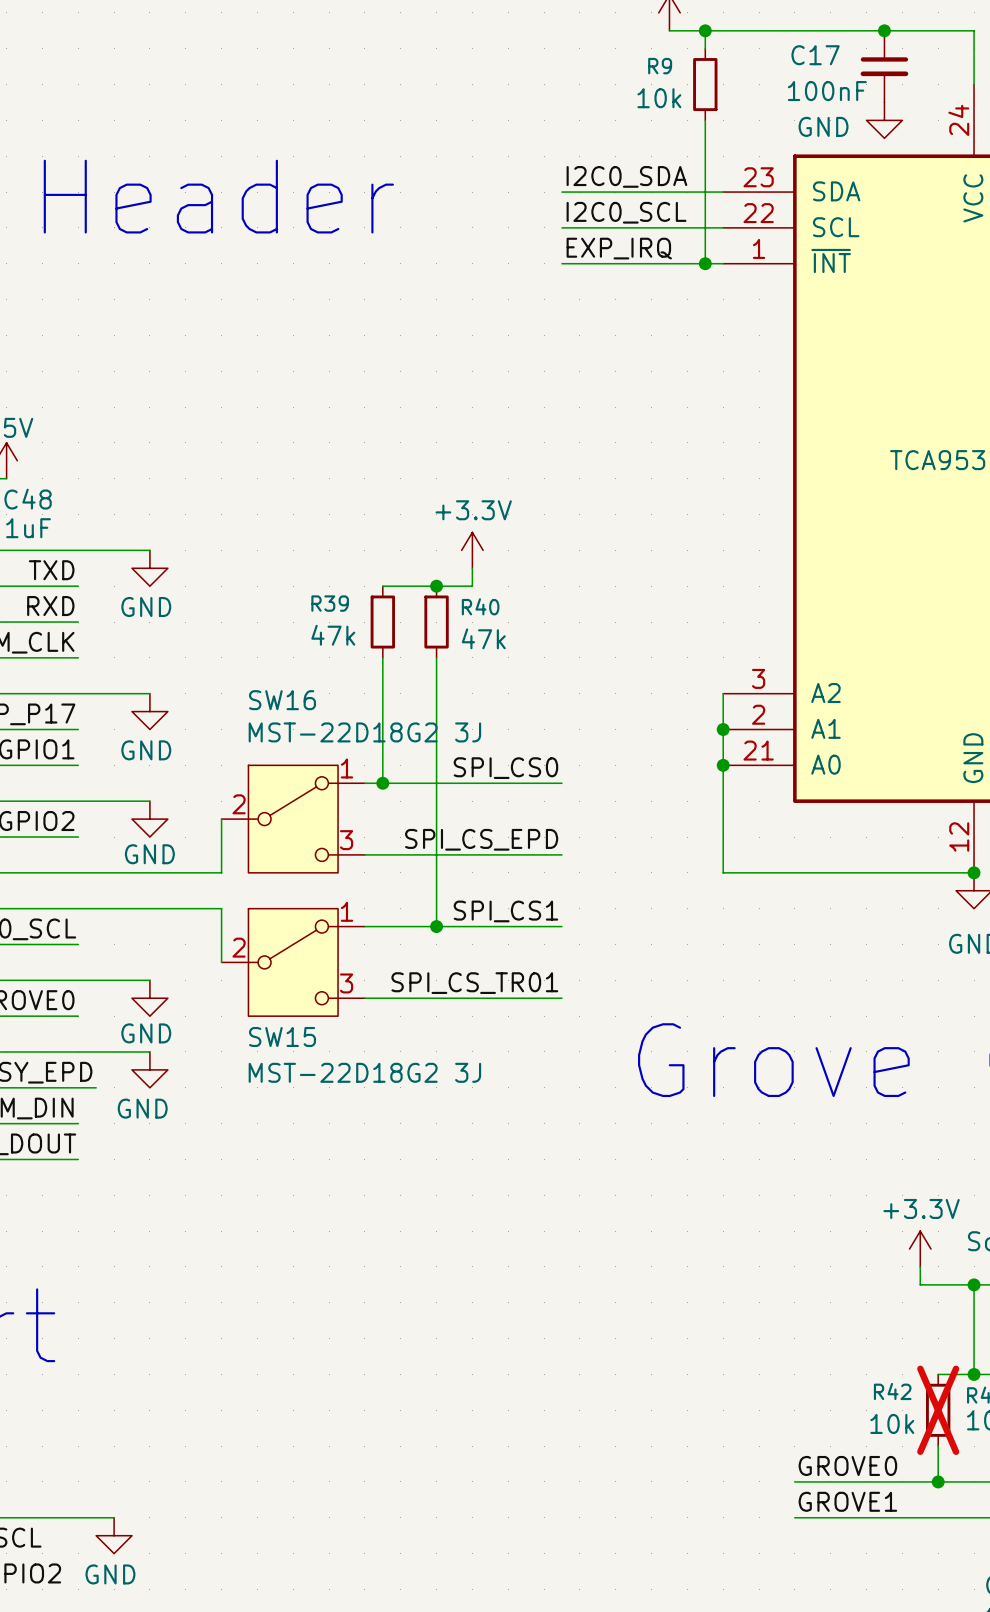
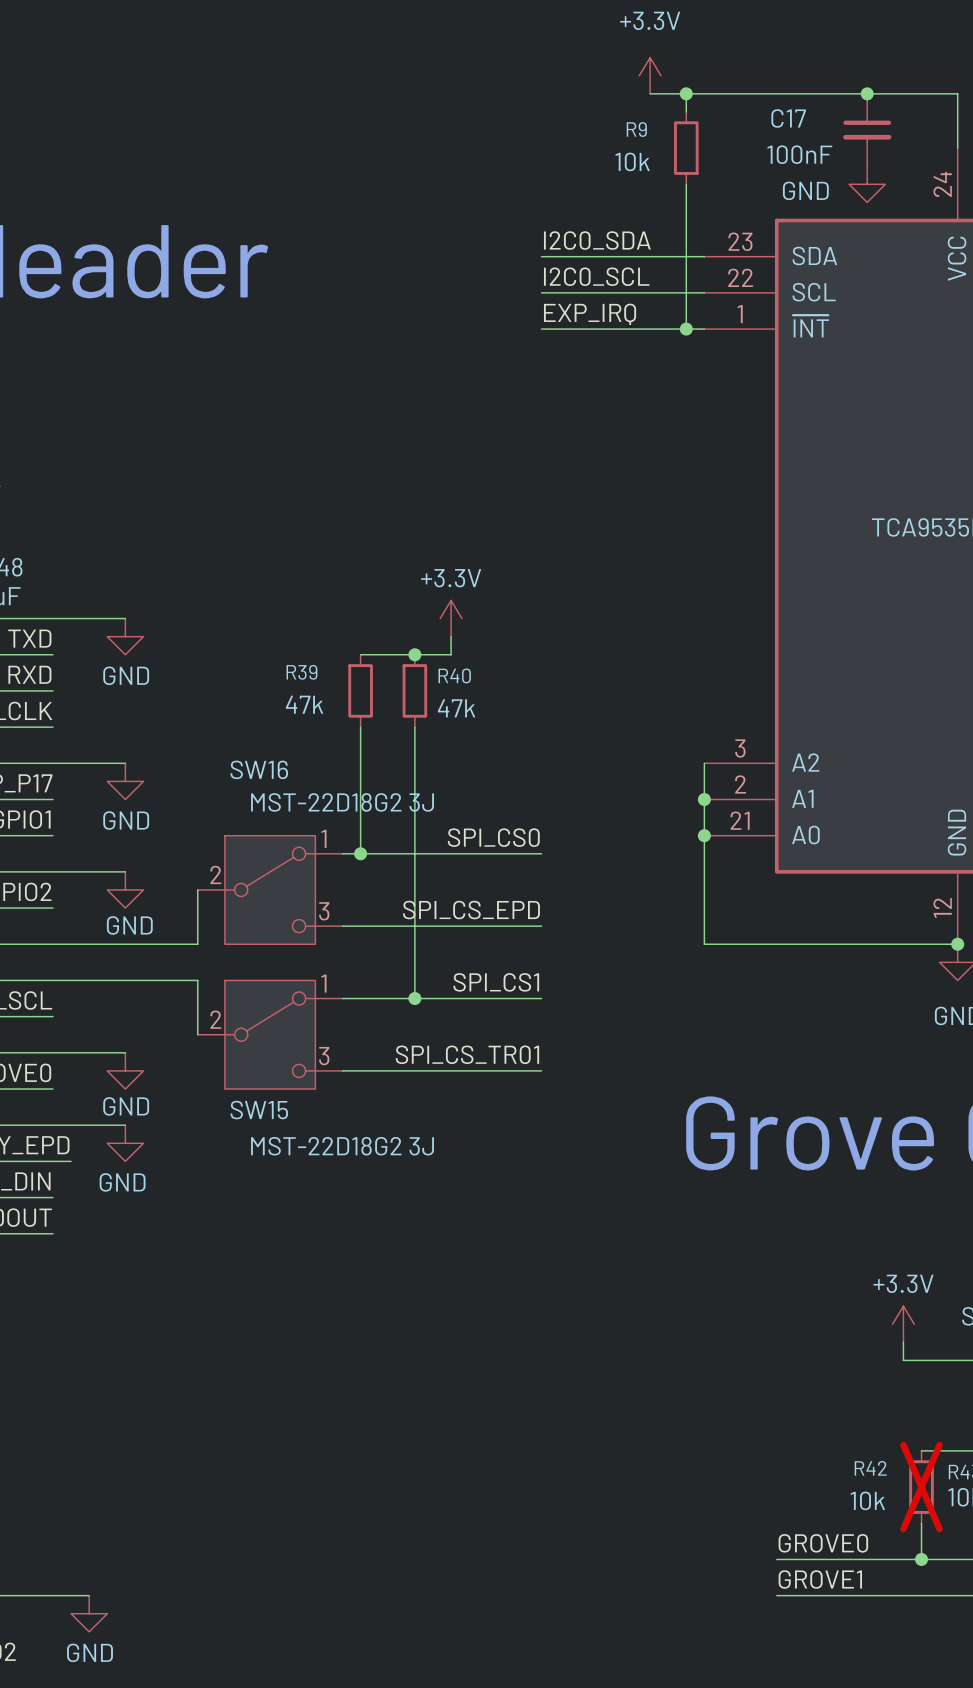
wire: (974, 1284) (974, 1374) -> none
junction: (974, 1284) -> none
junction: (974, 1374) -> none

